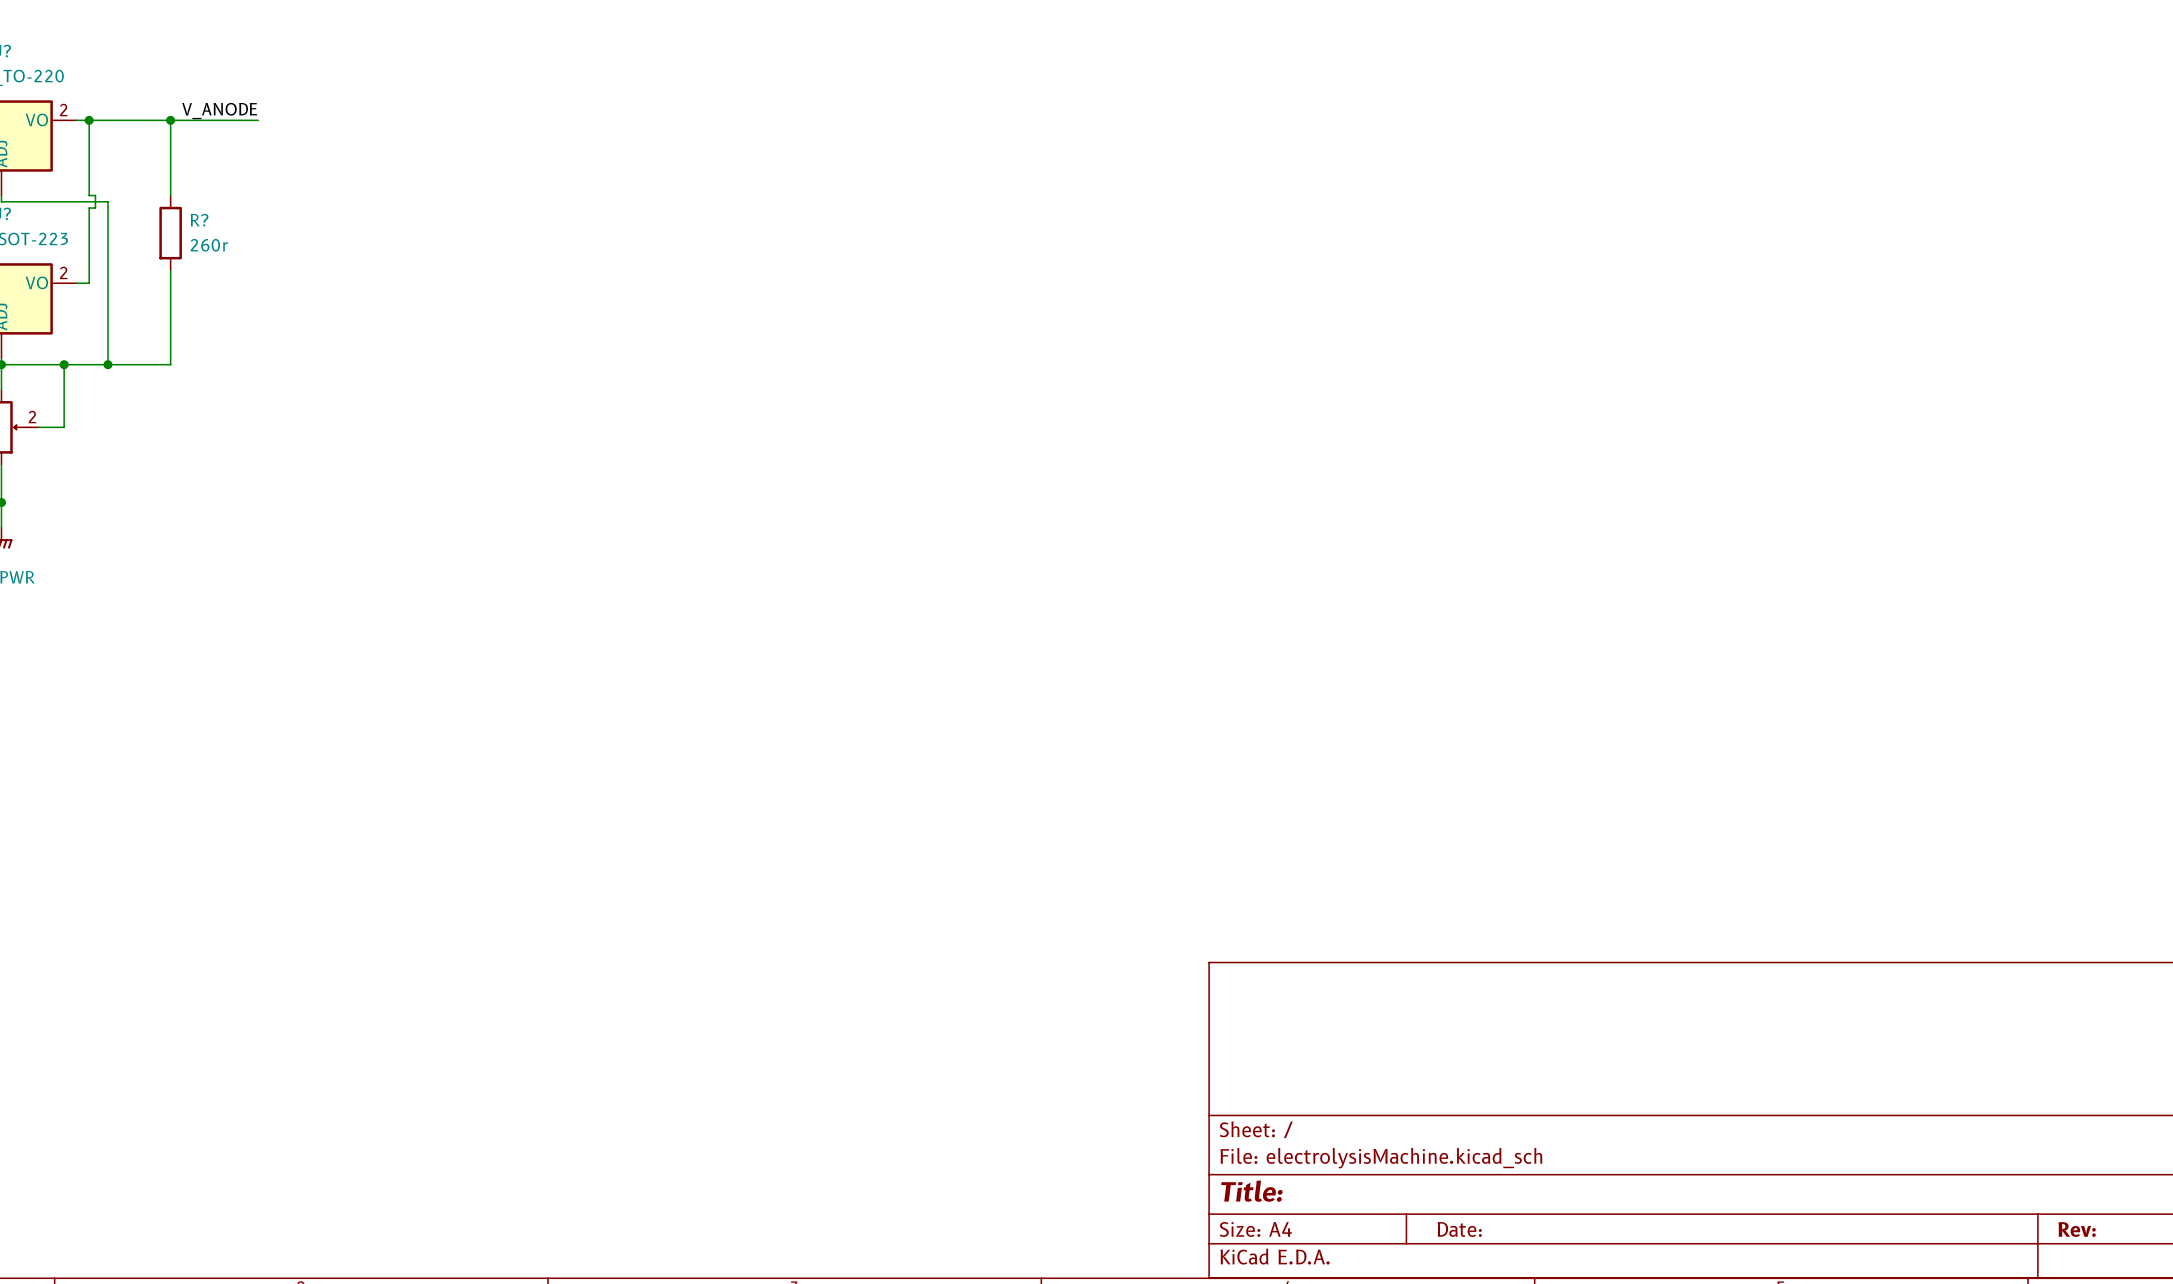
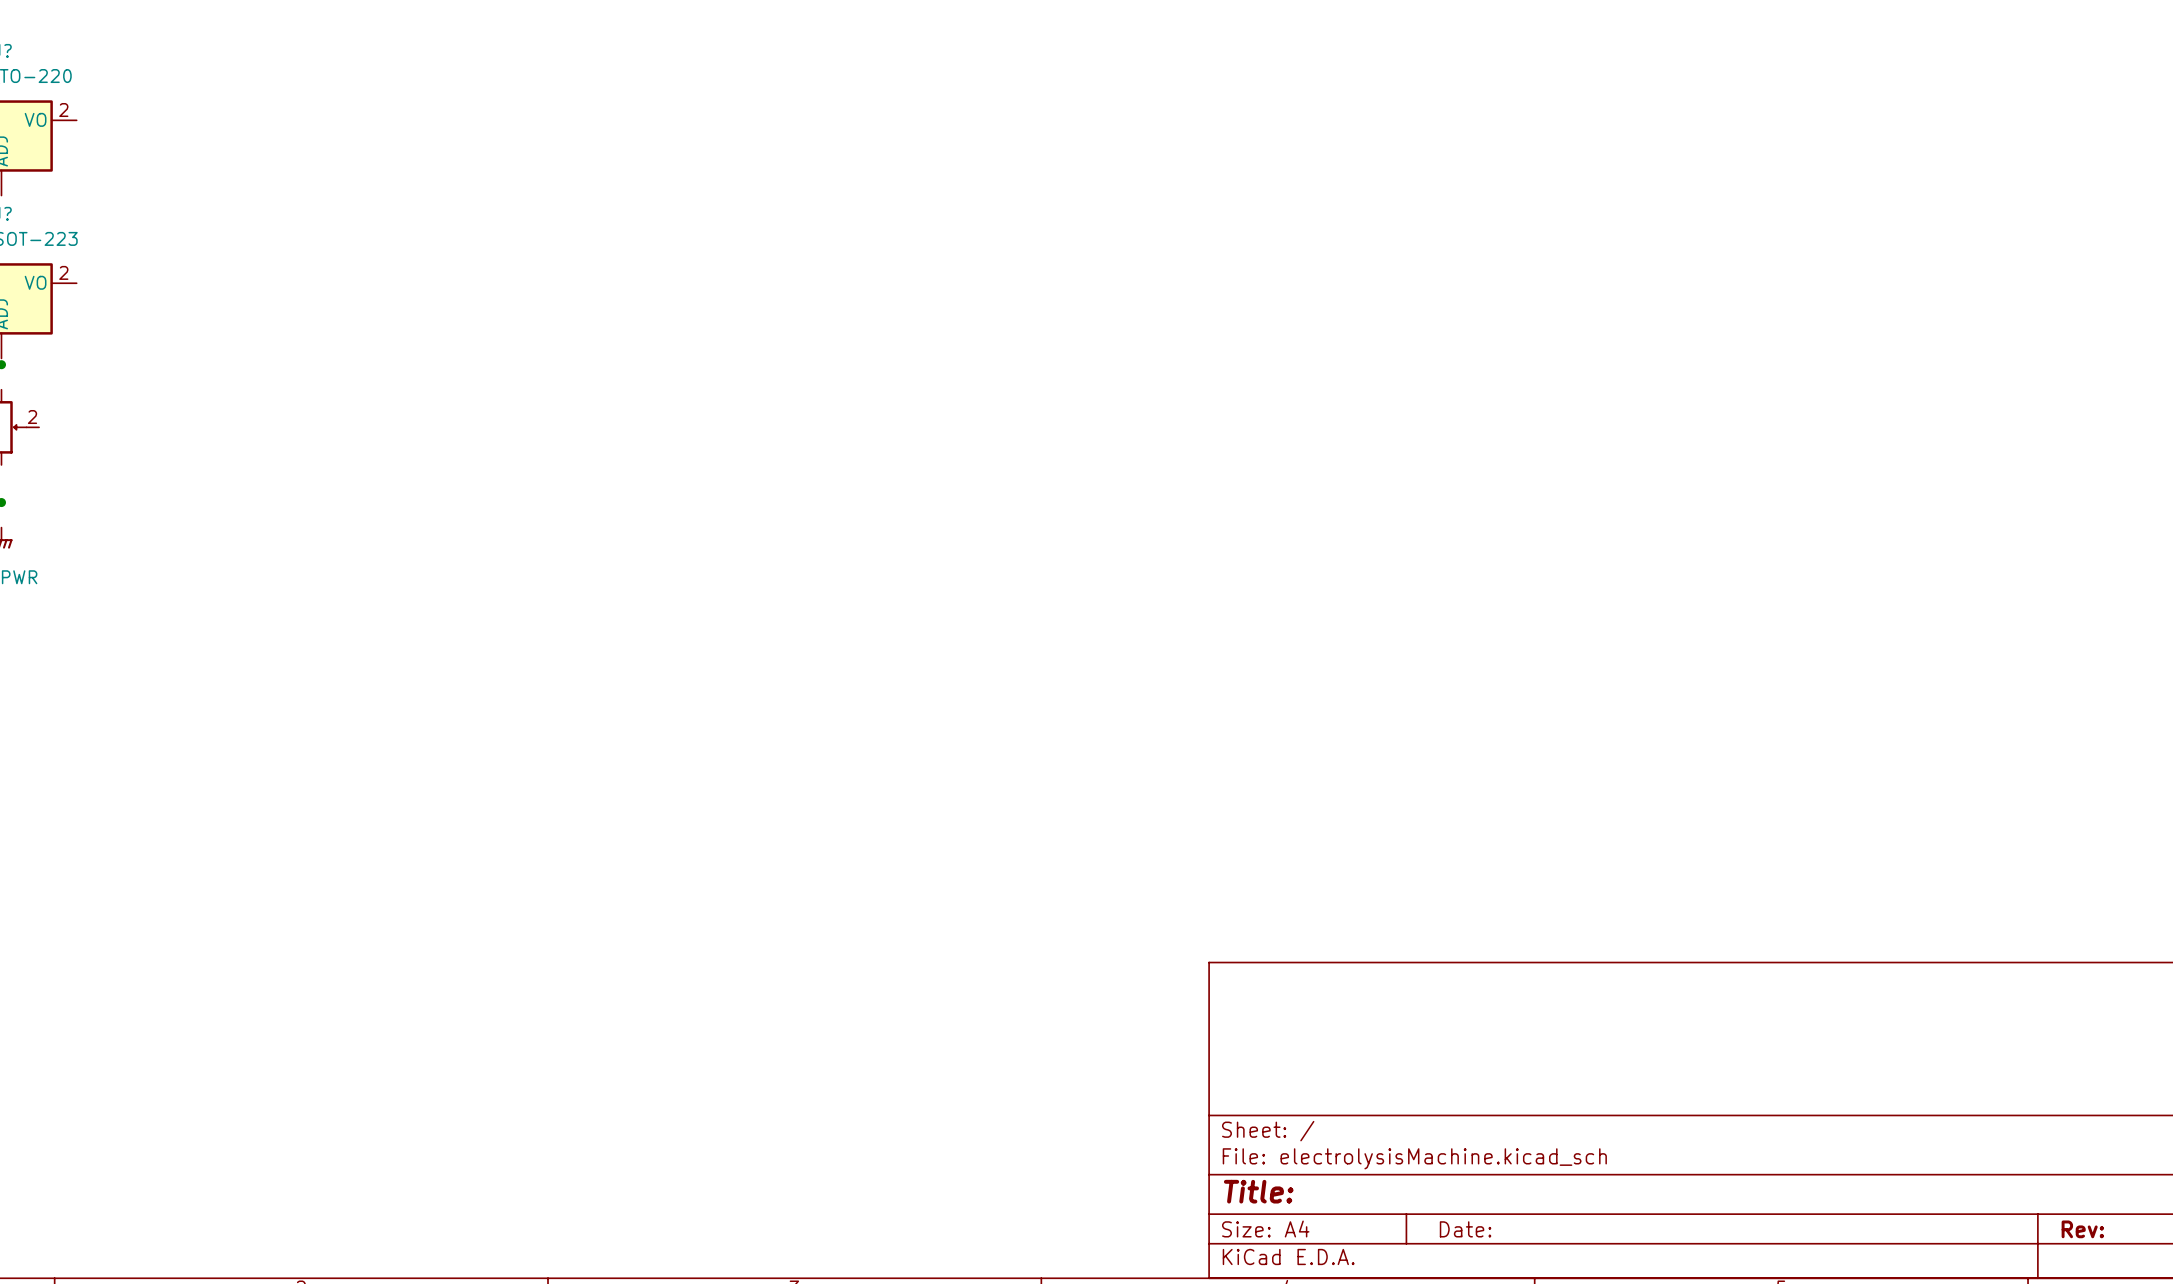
label: V_ANODE (219, 111) -> none
wire: (76, 120) (258, 120) -> none
wire: (89, 120) (89, 195) (95, 195) (95, 208) (89, 208) (89, 283) (76, 283) -> none
junction: (89, 120) -> none
wire: (170, 120) (170, 195) -> none
junction: (170, 120) -> none
wire: (1, 195) (1, 201) (107, 201) (107, 364) -> none
R?: 260r (170, 233) -> none
wire: (170, 270) (170, 364) (1, 364) -> none
wire: (1, 358) (1, 389) -> none
wire: (64, 364) (64, 427) (39, 427) -> none
junction: (64, 364) -> none
junction: (107, 364) -> none
wire: (1, 464) (1, 527) -> none

